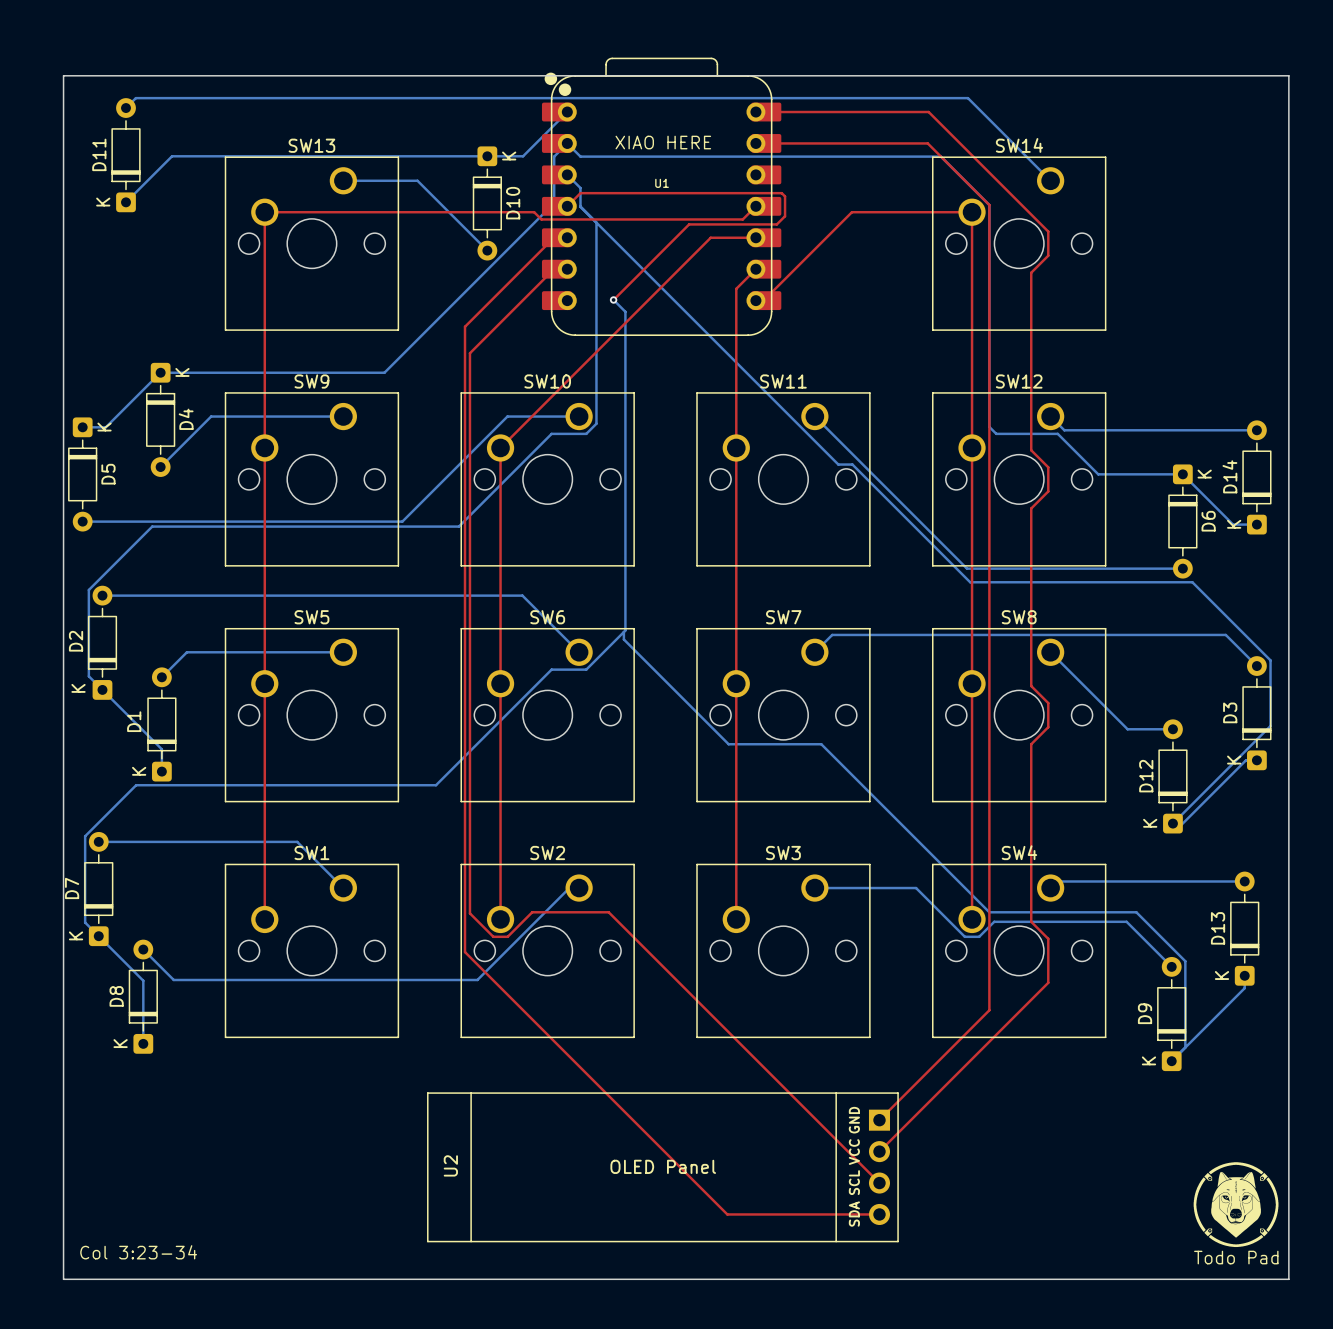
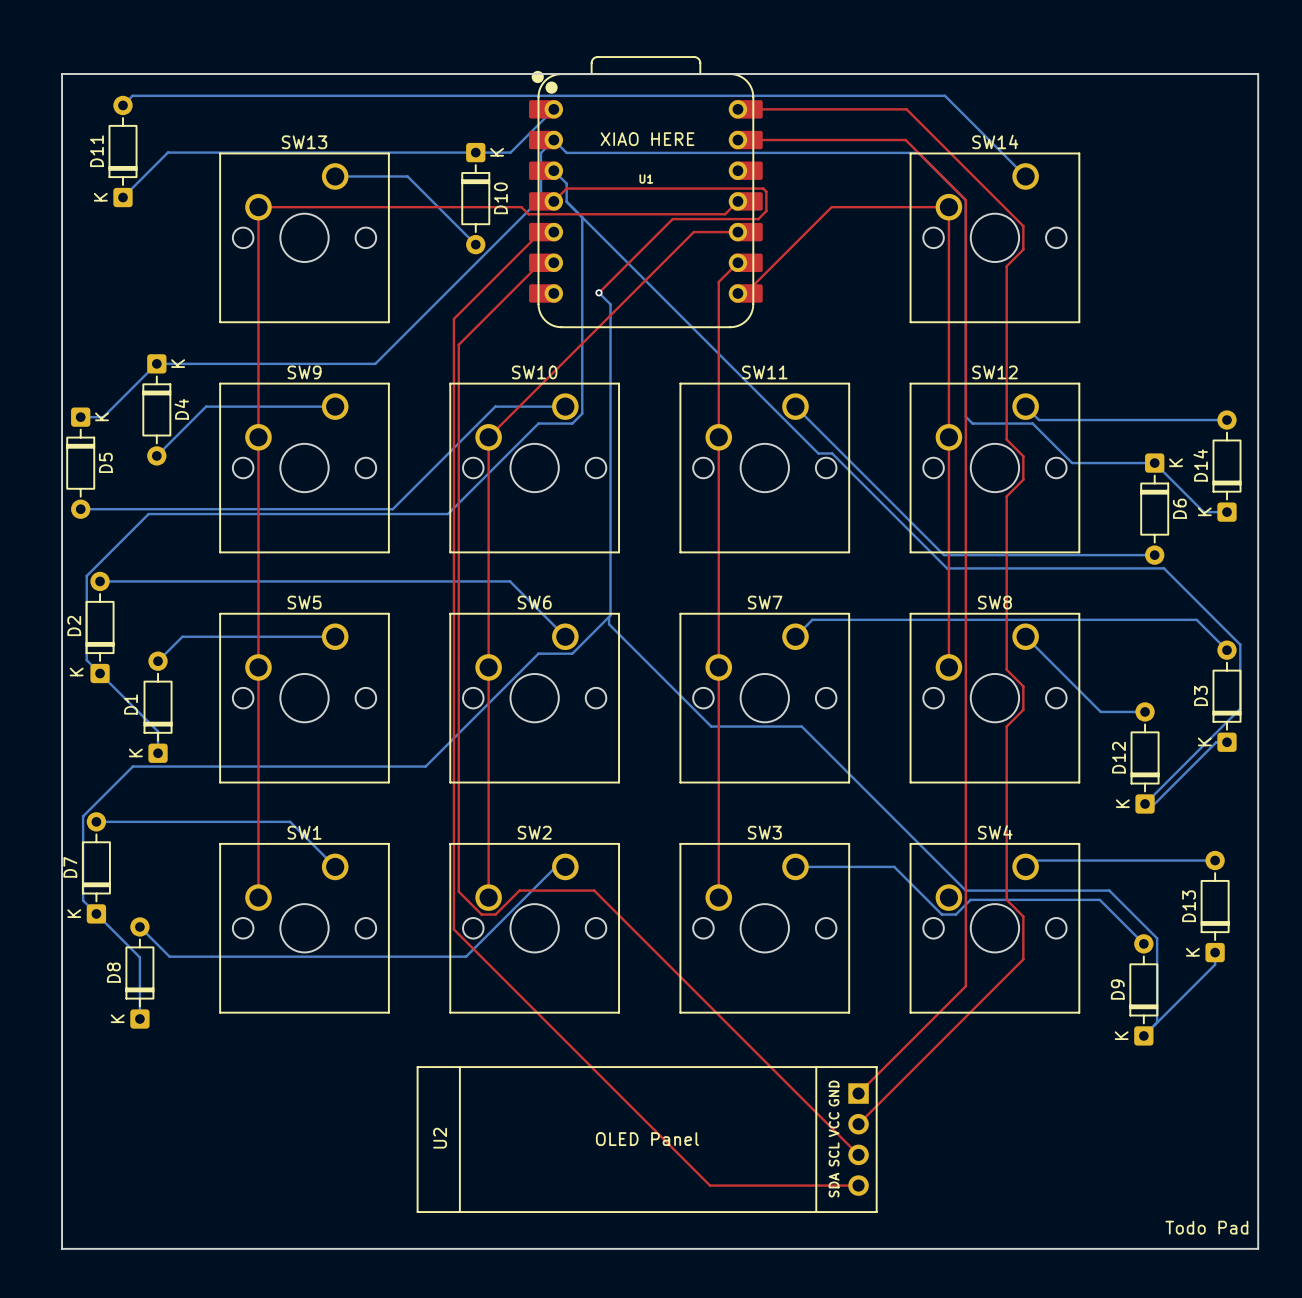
top track: (972, 683) (972, 919) -> none
drawing: [1193, 1162, 1279, 1248] -> none
text: Col 3:23-34 (138, 1252) -> none

